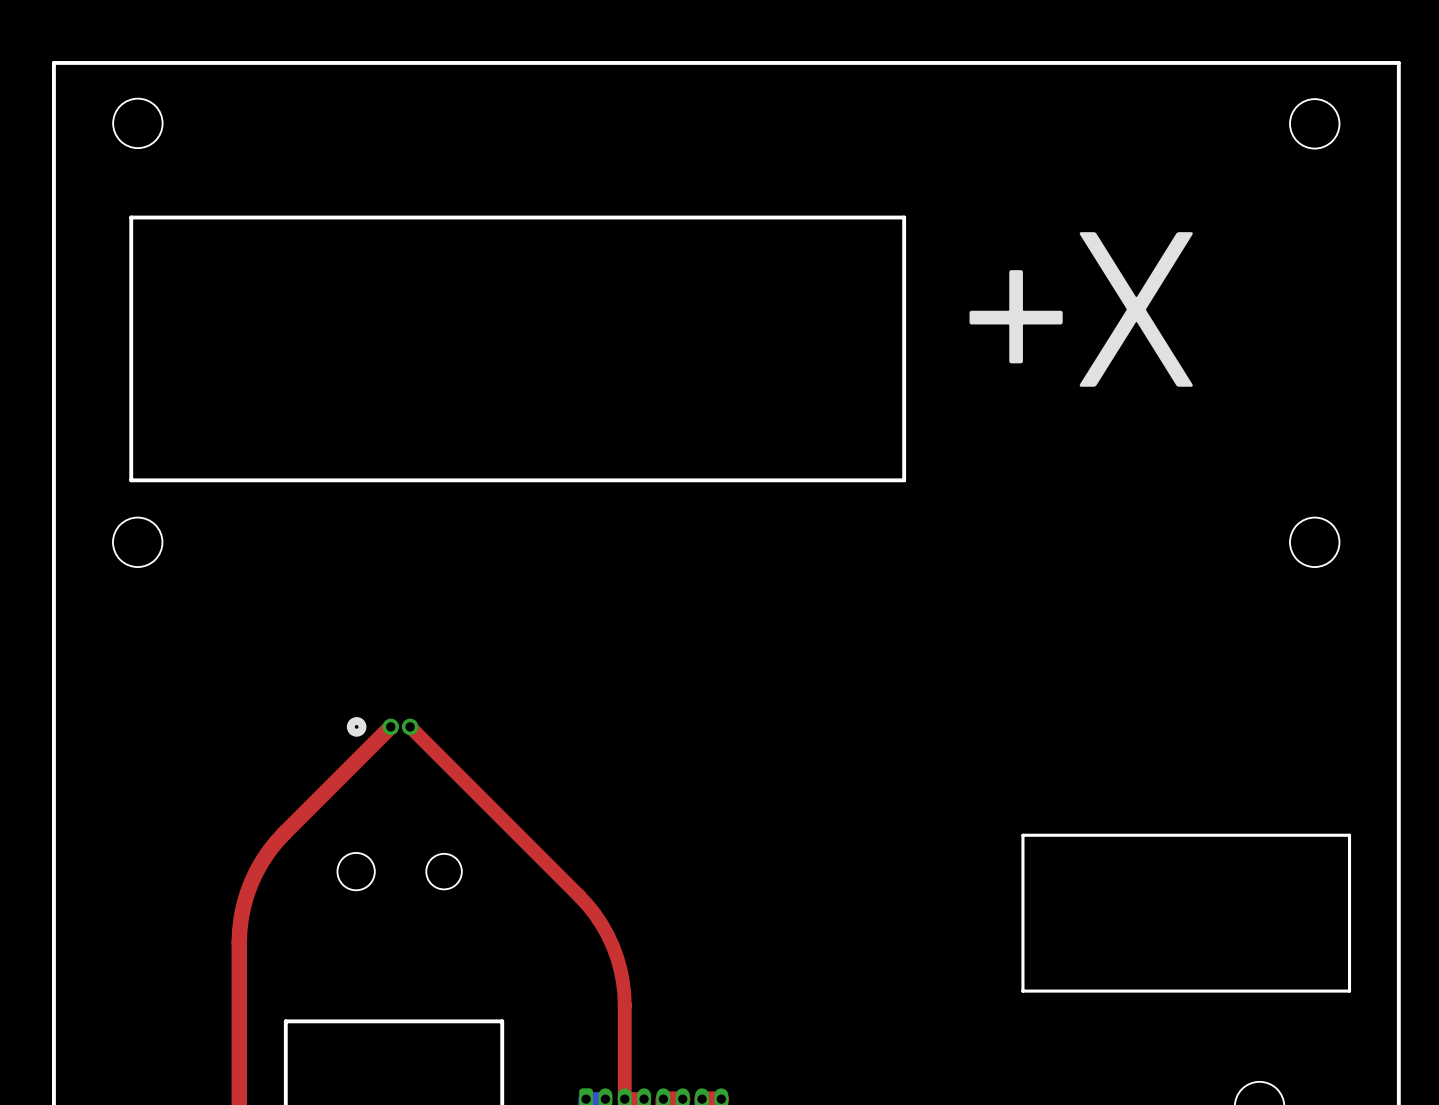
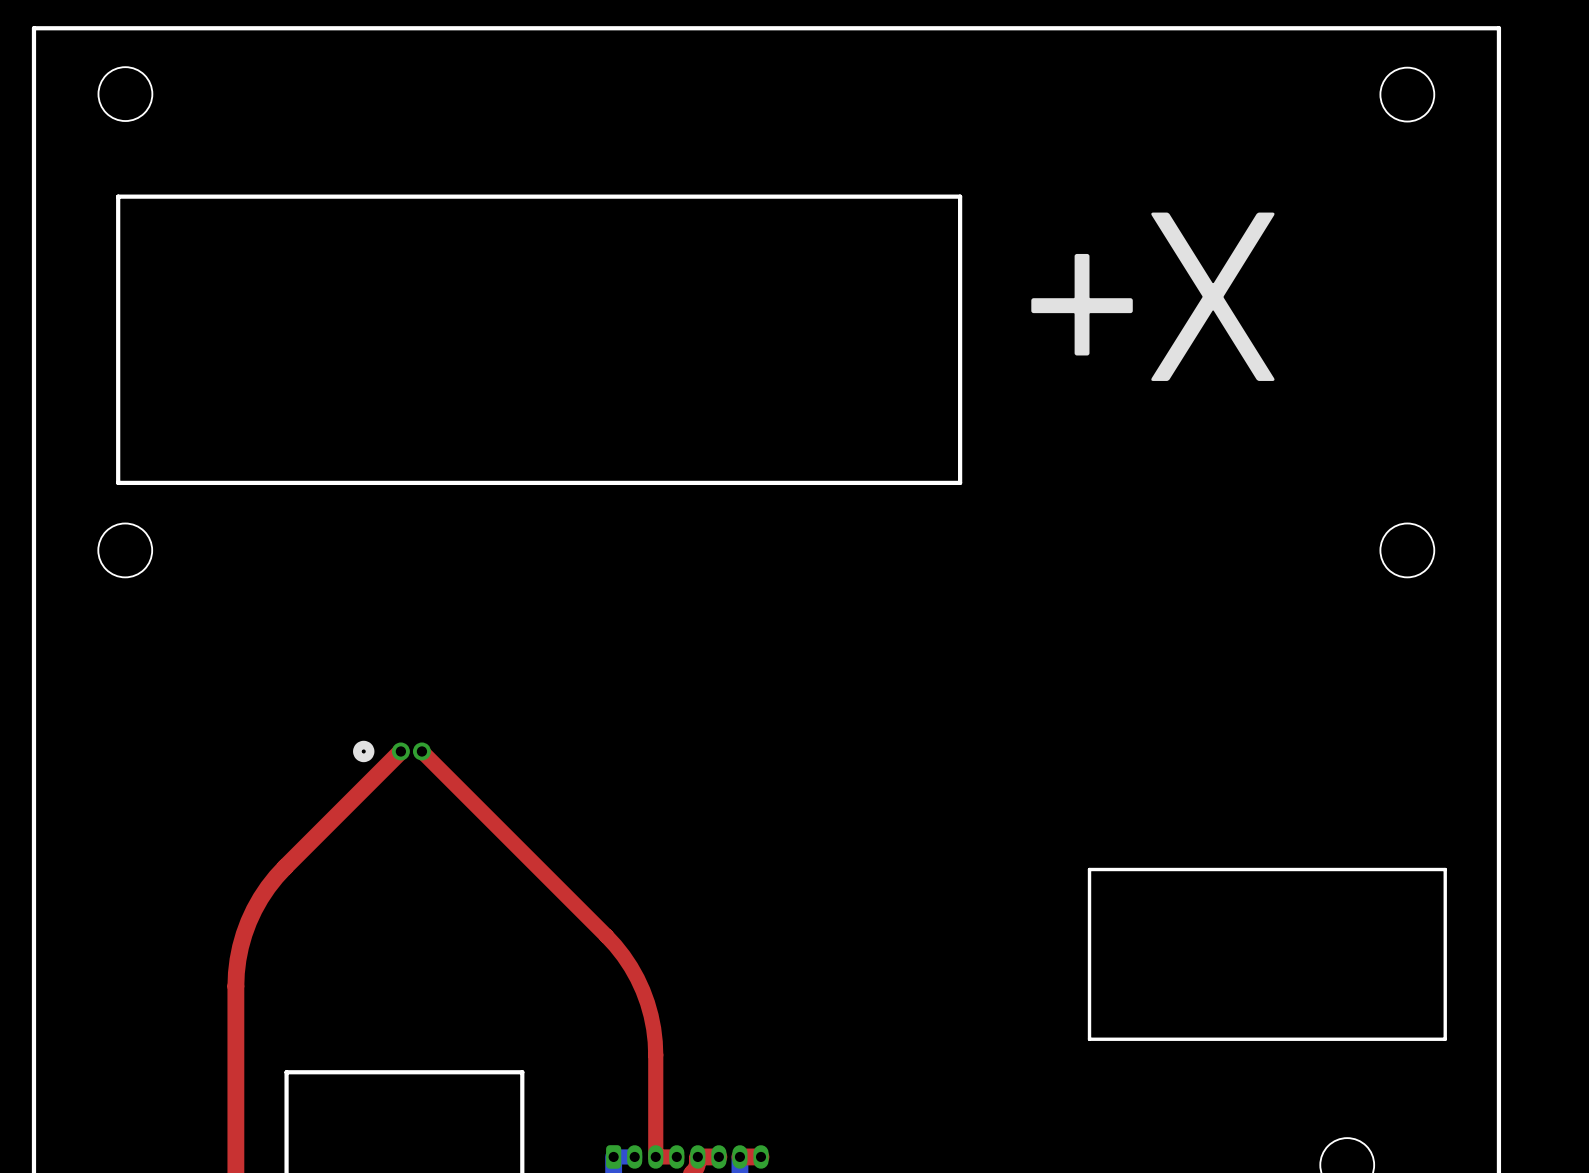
round board edge: [337, 852, 376, 891] -> none
round board edge: [425, 853, 463, 890] -> none

